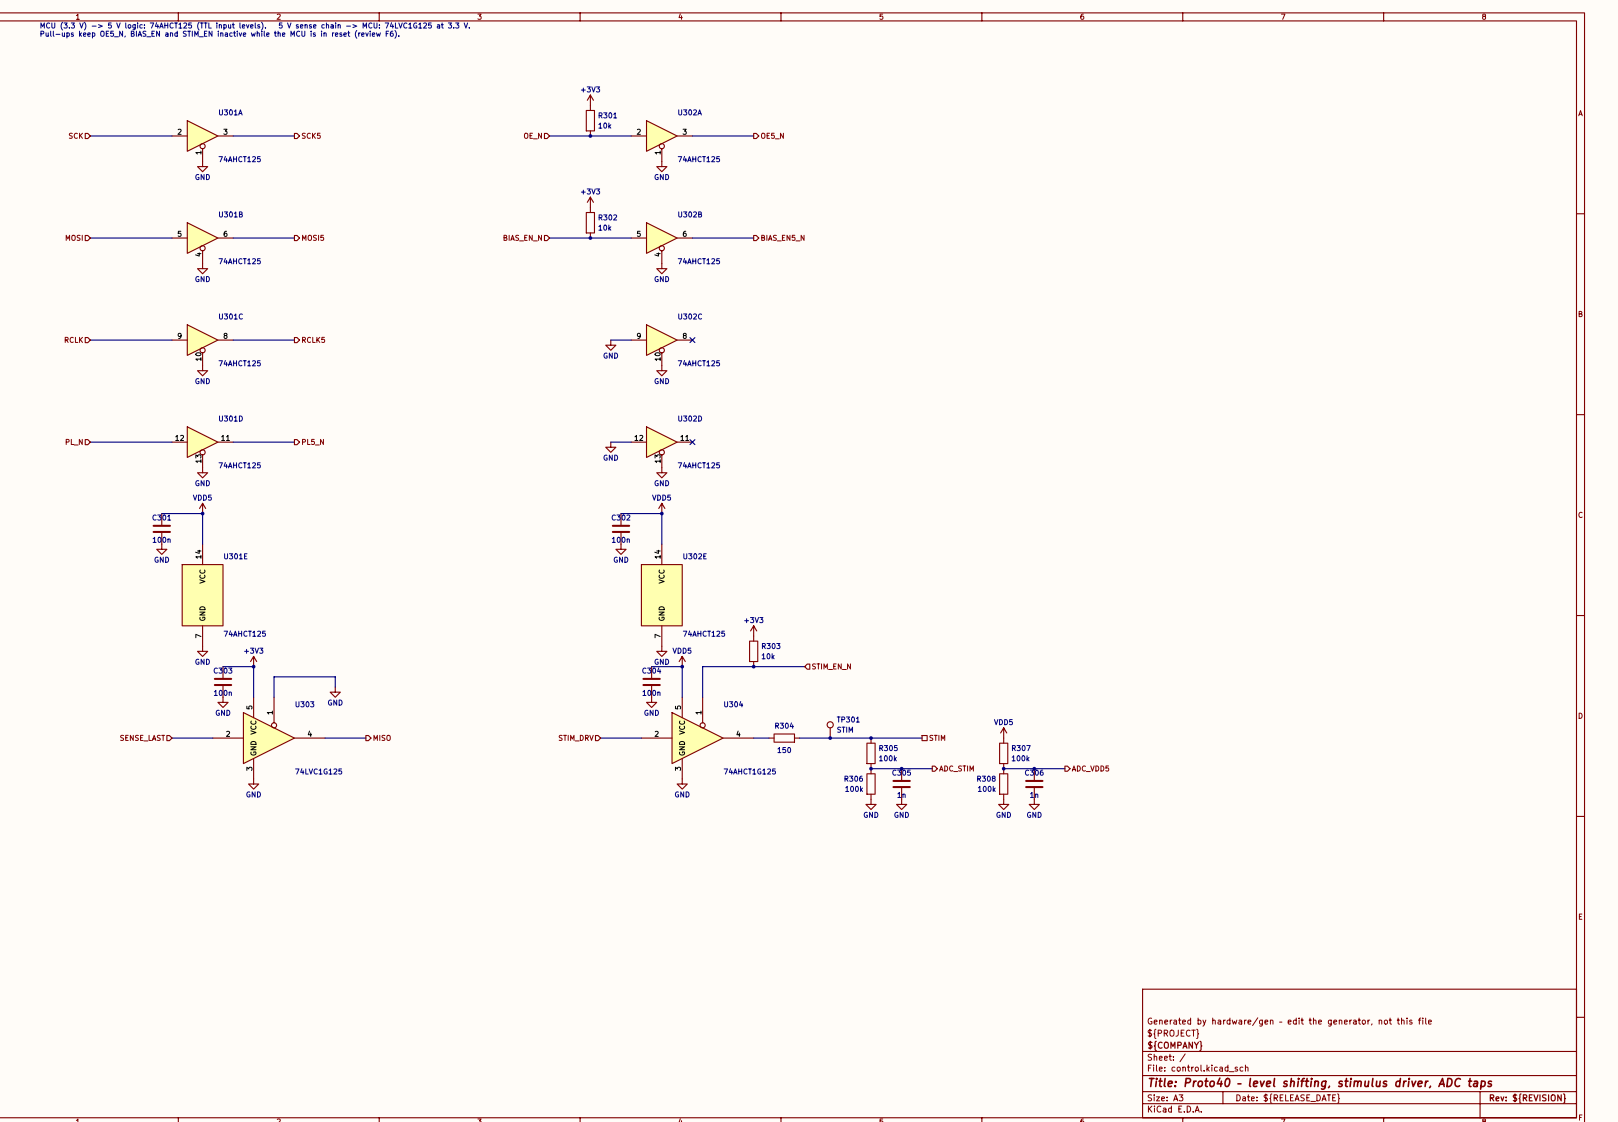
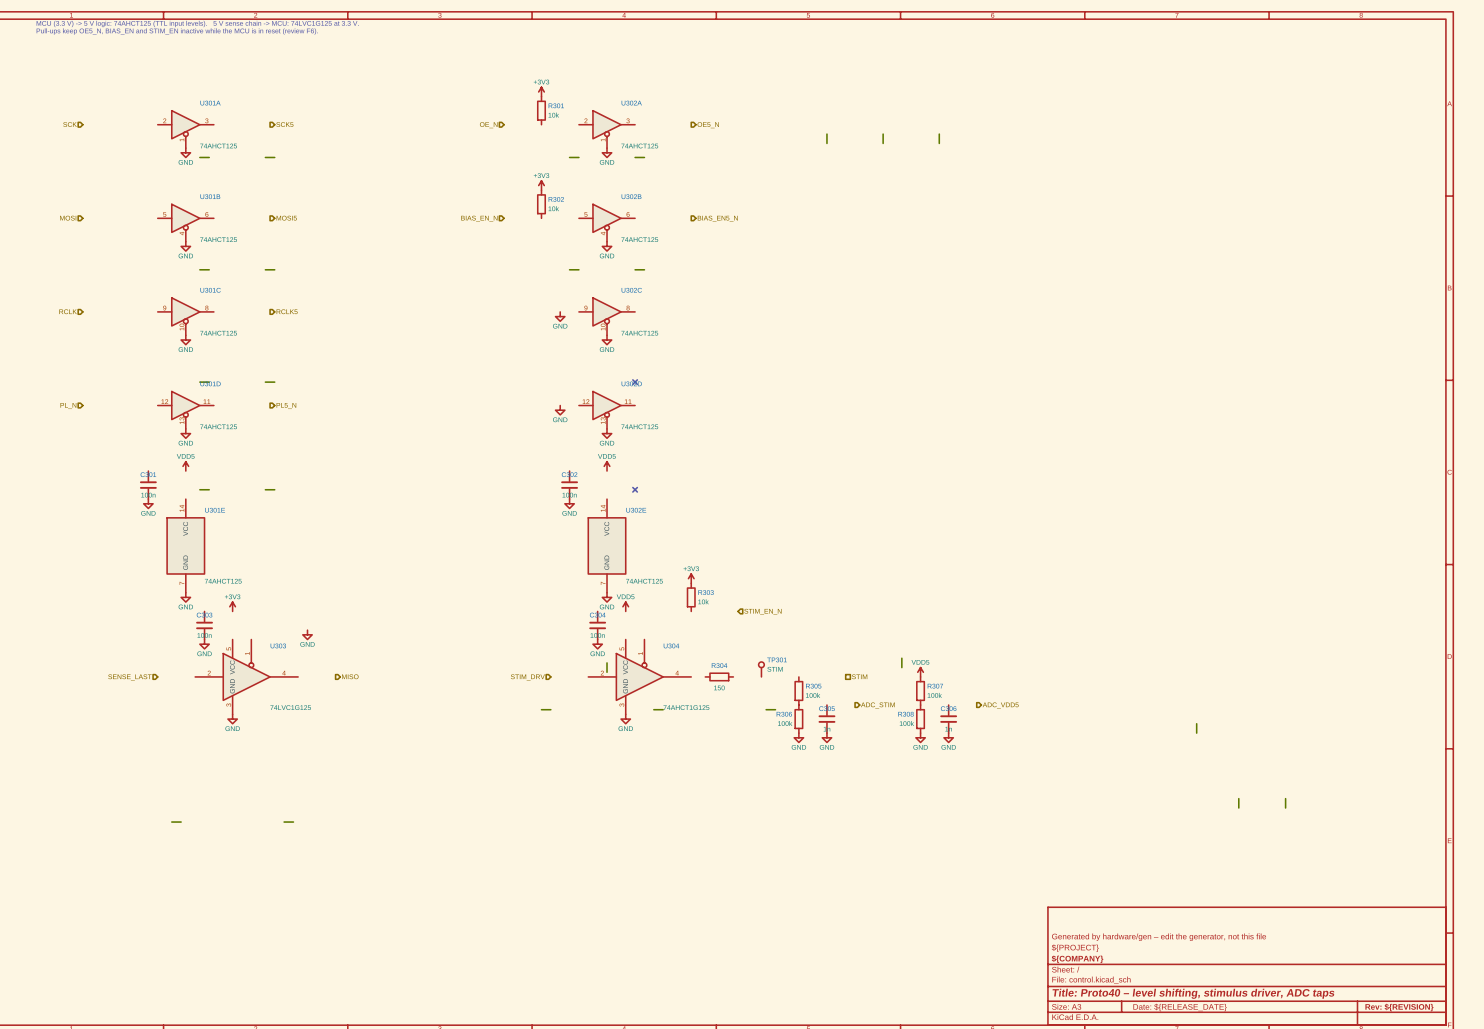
wire: (90, 135) (171, 135) -> none
wire: (233, 135) (294, 135) -> none
wire: (549, 135) (631, 135) -> none
junction: (590, 135) -> none
wire: (692, 135) (753, 135) -> none
wire: none -> (826, 134) (826, 143)
wire: none -> (883, 134) (883, 143)
wire: none -> (939, 134) (939, 143)
wire: none -> (199, 157) (209, 157)
wire: none -> (265, 157) (274, 157)
wire: none -> (569, 157) (578, 157)
wire: none -> (635, 157) (644, 157)
wire: (90, 238) (171, 238) -> none
wire: (233, 238) (294, 238) -> none
wire: (549, 238) (631, 238) -> none
junction: (590, 238) -> none
wire: (692, 238) (753, 238) -> none
wire: none -> (199, 269) (209, 269)
wire: none -> (265, 269) (274, 269)
wire: none -> (569, 269) (578, 269)
wire: none -> (635, 269) (644, 269)
wire: (90, 340) (171, 340) -> none
wire: (233, 340) (294, 340) -> none
wire: (610, 340) (631, 340) -> none
no-connect mark: (692, 340) -> none
wire: none -> (199, 382) (209, 382)
wire: none -> (265, 382) (274, 382)
no-connect mark: none -> (635, 382)
wire: (90, 442) (171, 442) -> none
wire: (233, 442) (294, 442) -> none
wire: (610, 442) (631, 442) -> none
no-connect mark: (692, 442) -> none
wire: (161, 513) (202, 513) (202, 544) -> none
junction: (202, 513) -> none
wire: (621, 513) (661, 513) (661, 544) -> none
junction: (661, 513) -> none
wire: none -> (199, 489) (209, 489)
wire: none -> (265, 489) (274, 489)
no-connect mark: none -> (635, 489)
wire: (223, 666) (253, 666) (253, 697) -> none
junction: (253, 666) -> none
wire: (651, 666) (682, 666) (682, 697) -> none
junction: (682, 666) -> none
junction: (753, 666) -> none
wire: (804, 666) (702, 666) (702, 697) -> none
wire: (335, 687) (335, 676) (274, 676) (274, 697) -> none
wire: none -> (901, 658) (901, 667)
wire: none -> (607, 662) (607, 672)
wire: (171, 738) (212, 738) -> none
wire: (325, 738) (365, 738) -> none
wire: (600, 738) (641, 738) -> none
wire: (753, 738) (768, 738) -> none
wire: (799, 738) (922, 738) -> none
junction: (830, 738) -> none
junction: (871, 738) -> none
wire: (871, 768) (932, 768) -> none
junction: (871, 768) -> none
junction: (901, 768) -> none
wire: (1003, 768) (1064, 768) -> none
junction: (1003, 768) -> none
junction: (1034, 768) -> none
wire: none -> (541, 709) (550, 709)
wire: none -> (653, 709) (663, 709)
wire: none -> (766, 709) (775, 709)
wire: none -> (1196, 723) (1196, 733)
wire: none -> (1238, 798) (1238, 807)
wire: none -> (1285, 798) (1285, 807)
wire: none -> (171, 822) (181, 822)
wire: none -> (284, 822) (293, 822)

